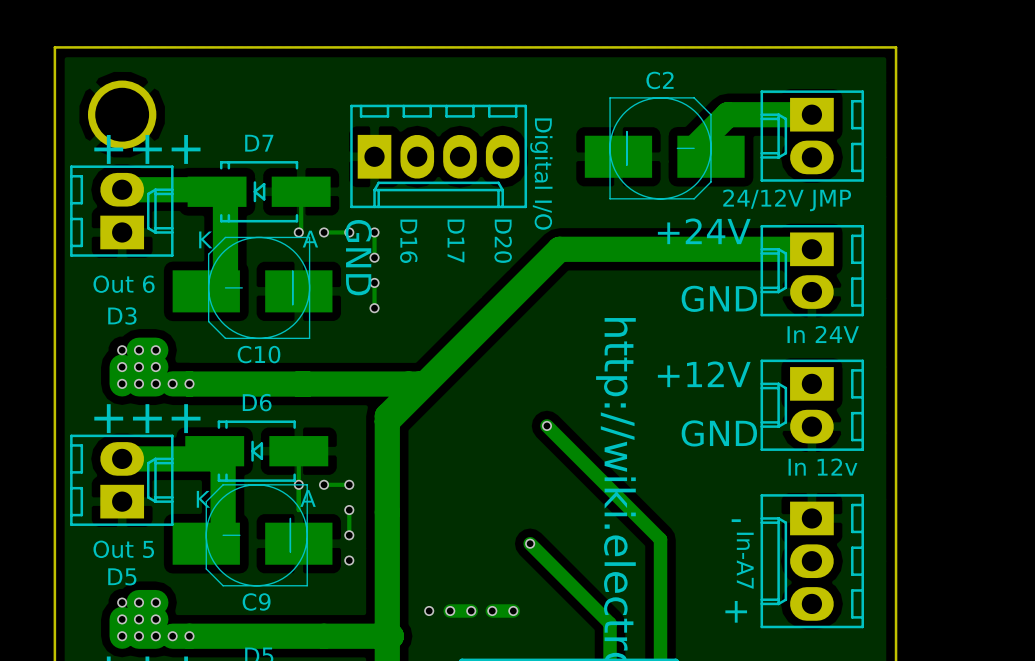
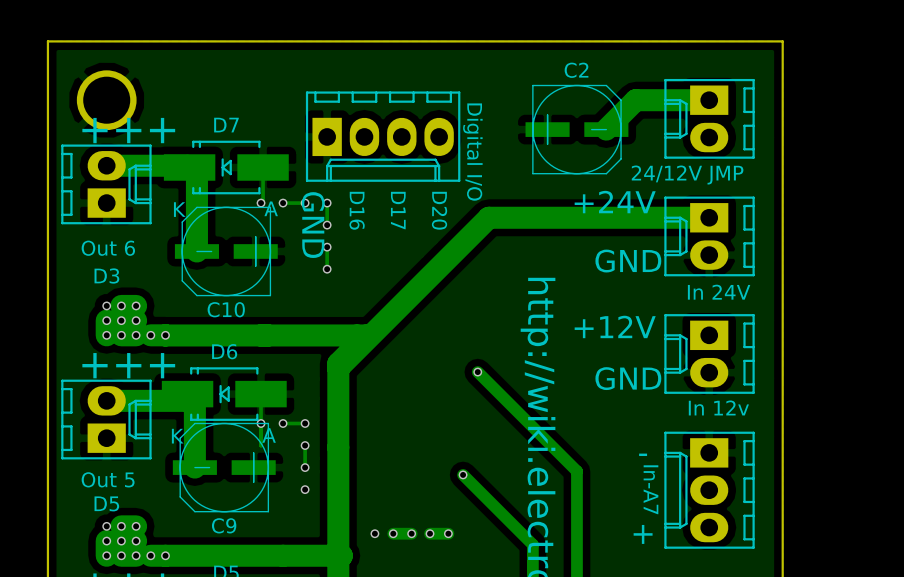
C2 footprint: [584, 97, 745, 199] -> [525, 85, 629, 174]
C10 footprint: [172, 237, 333, 339] -> [174, 207, 278, 296]
C9 footprint: [172, 484, 333, 586] -> [172, 423, 276, 512]

